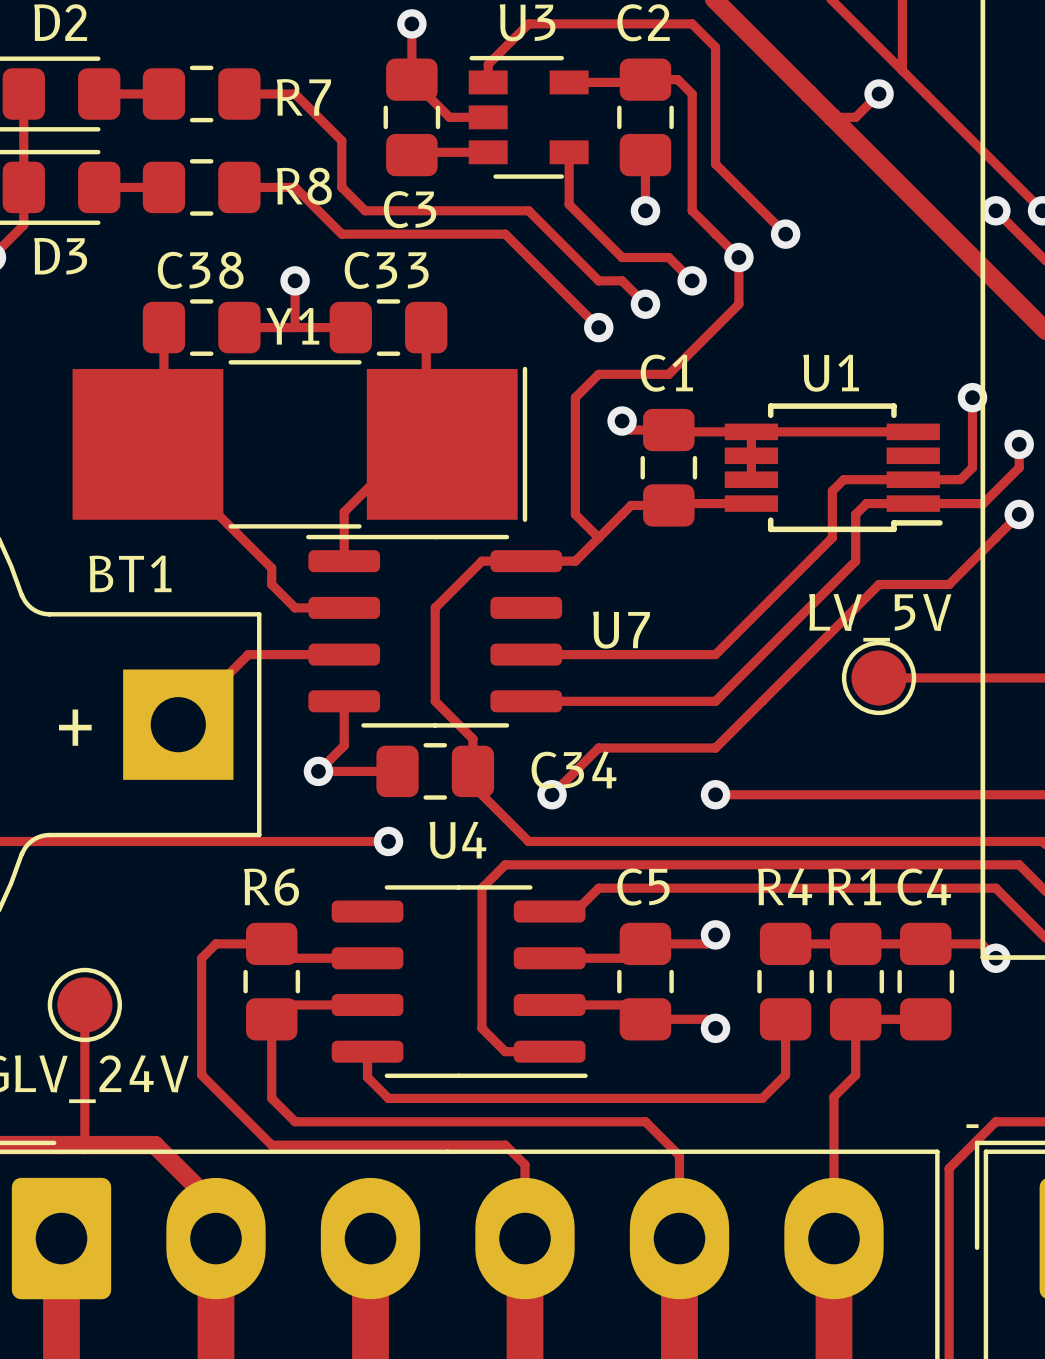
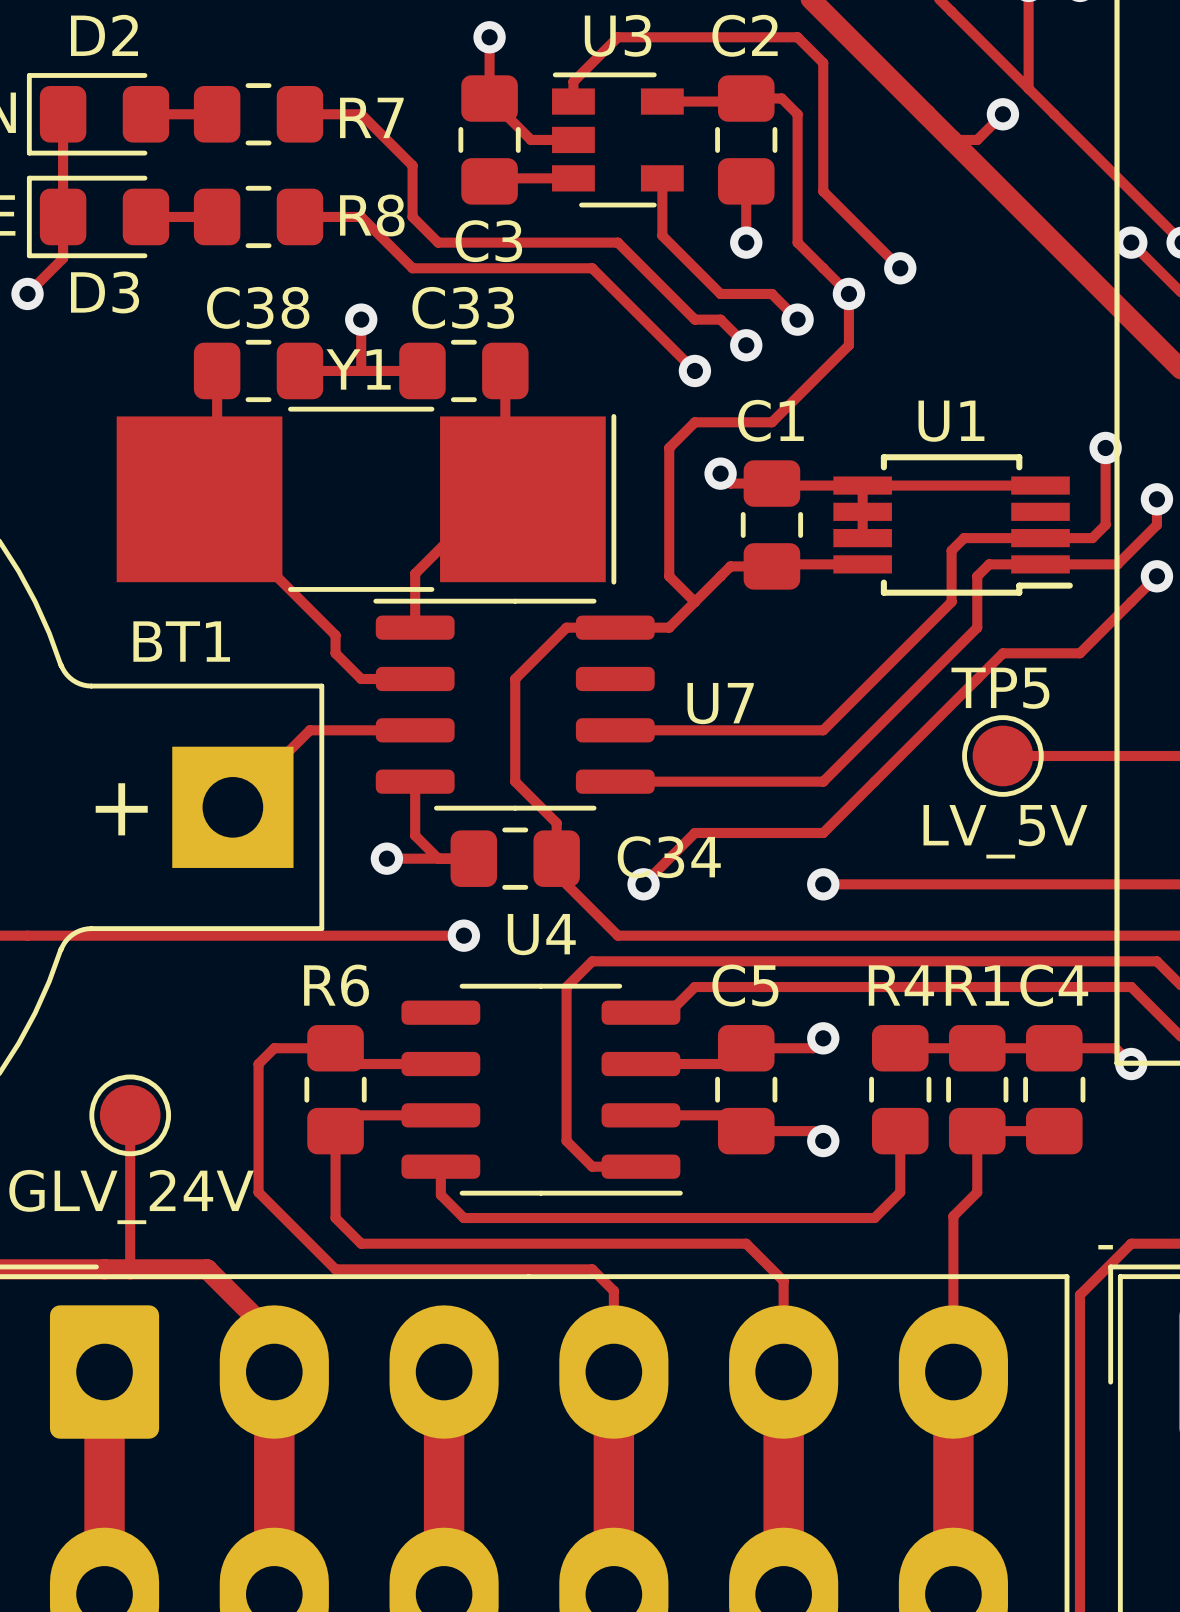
TP5 name: none -> TP5 (1000, 688)
TP5 value position: LV_5V (880, 617) -> LV_5V (1005, 831)
track: (344, 745) (318, 771) -> (415, 830) (415, 835) (438, 858)

